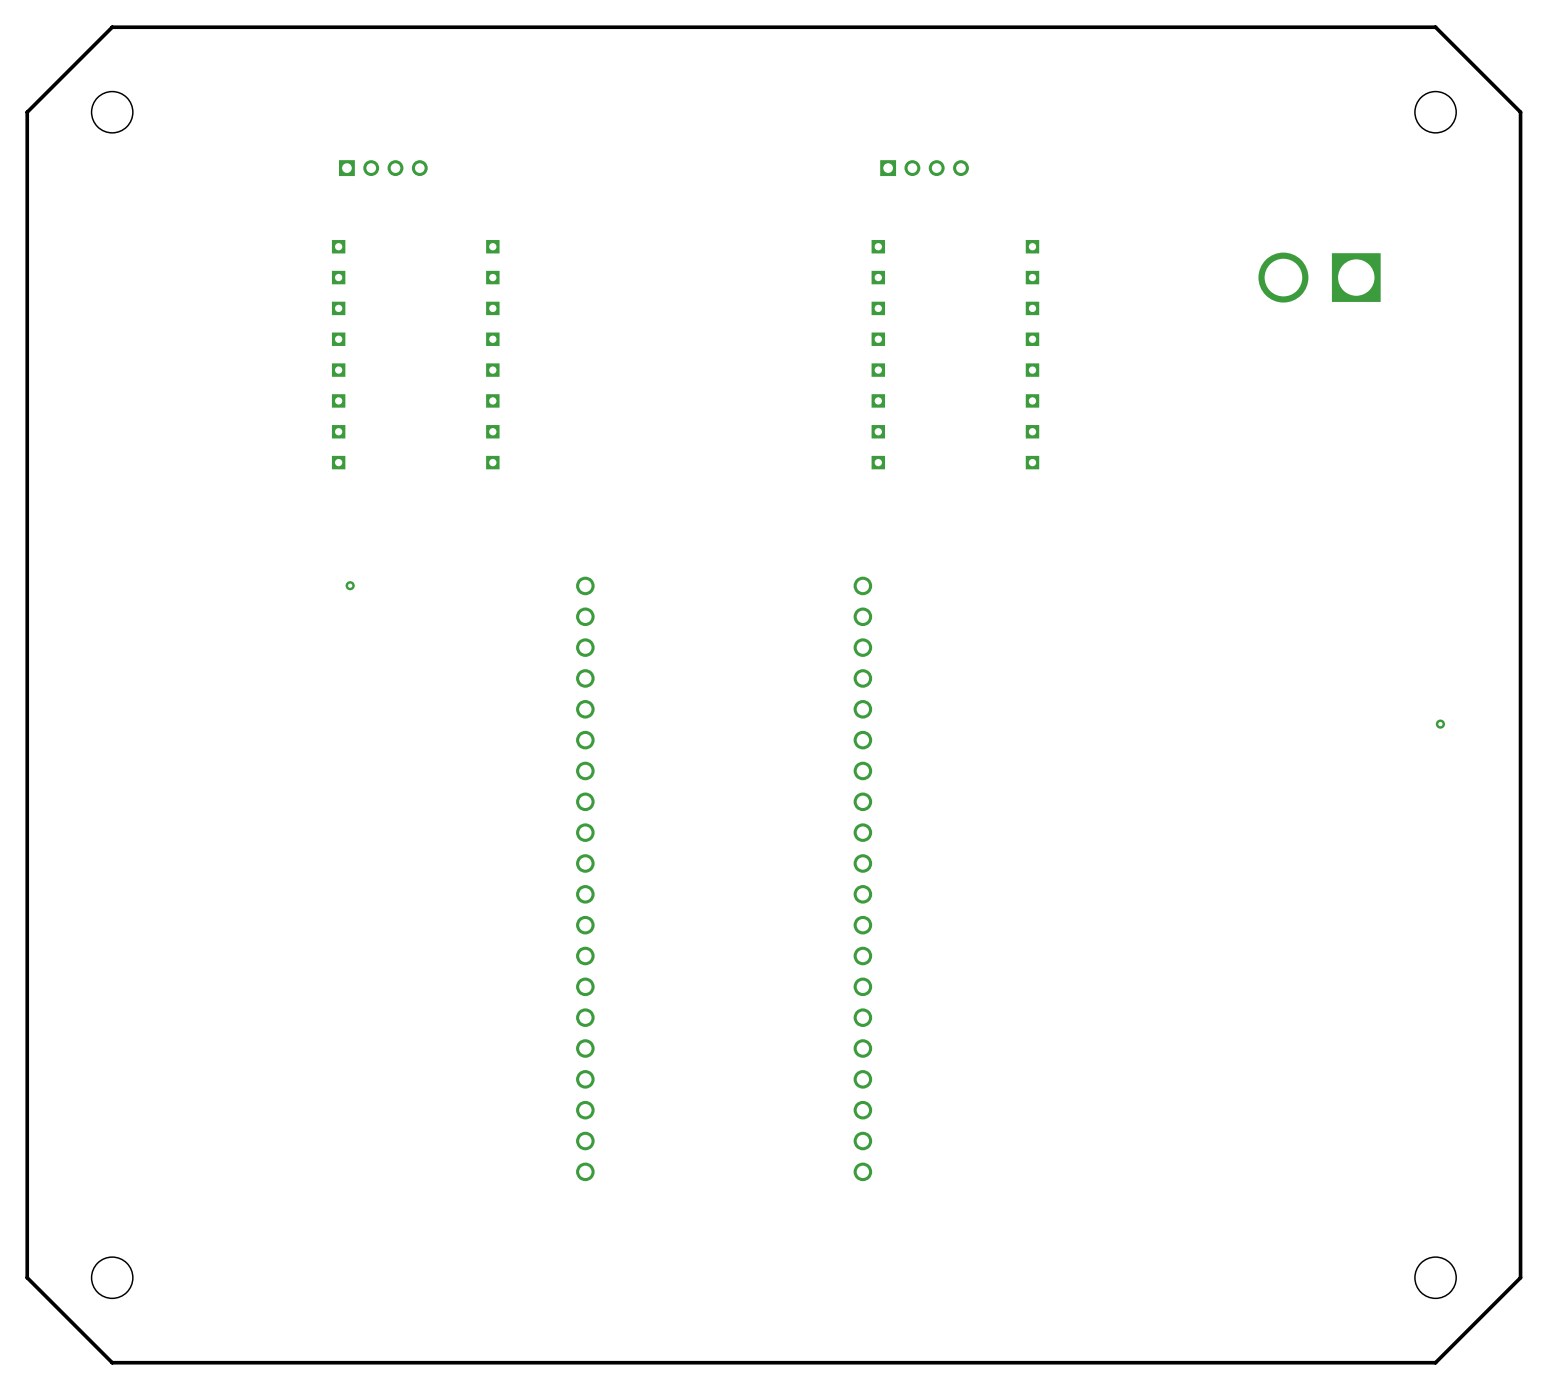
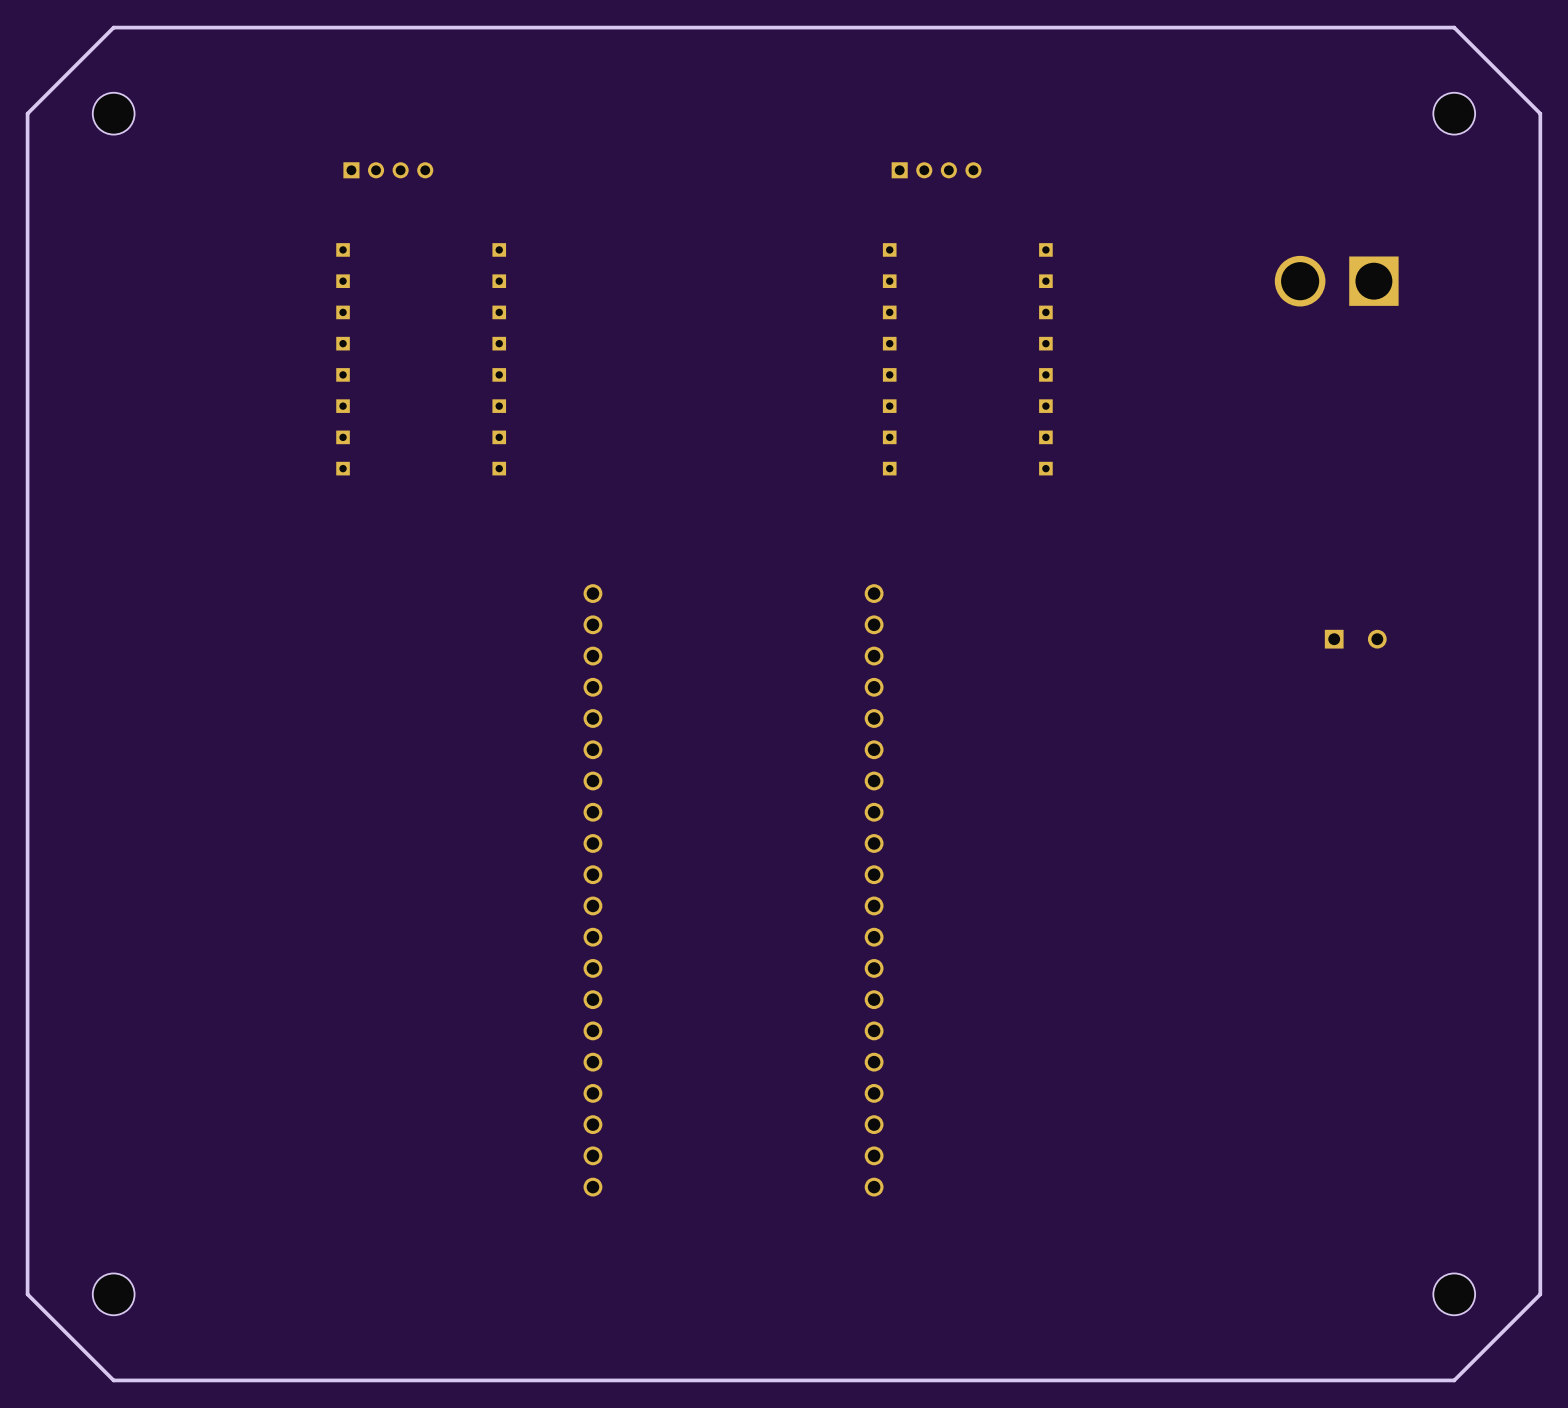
via: (350, 585) -> none
part: none -> (1355, 639)
via: (1440, 724) -> none

